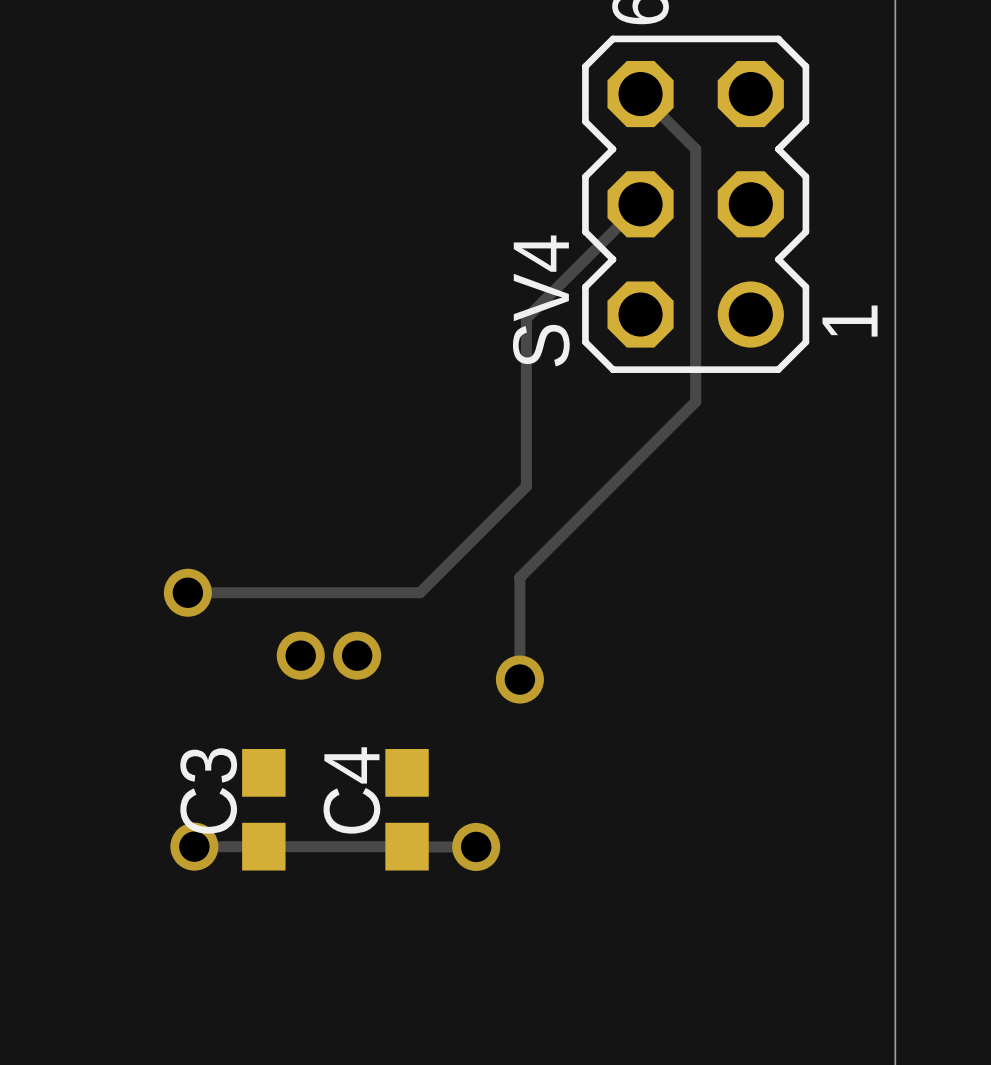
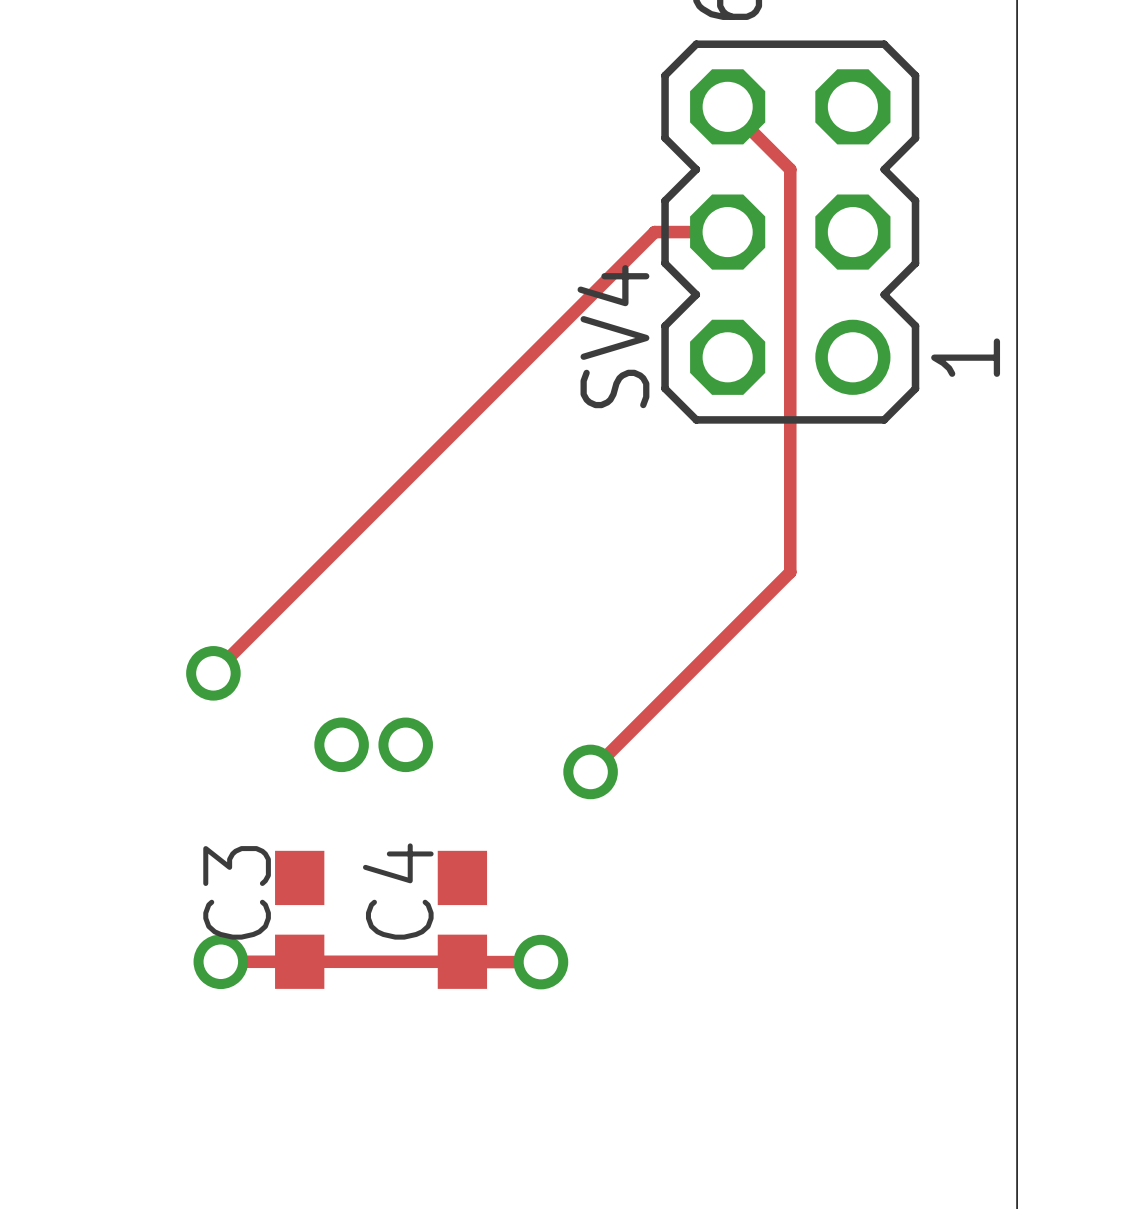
track: (640, 204) (526, 318) (526, 486) (420, 592) (187, 592) -> (727, 232) (654, 232) (213, 673)
track: (695, 401) (519, 577) (519, 679) -> (790, 456) (790, 572) (590, 771)

